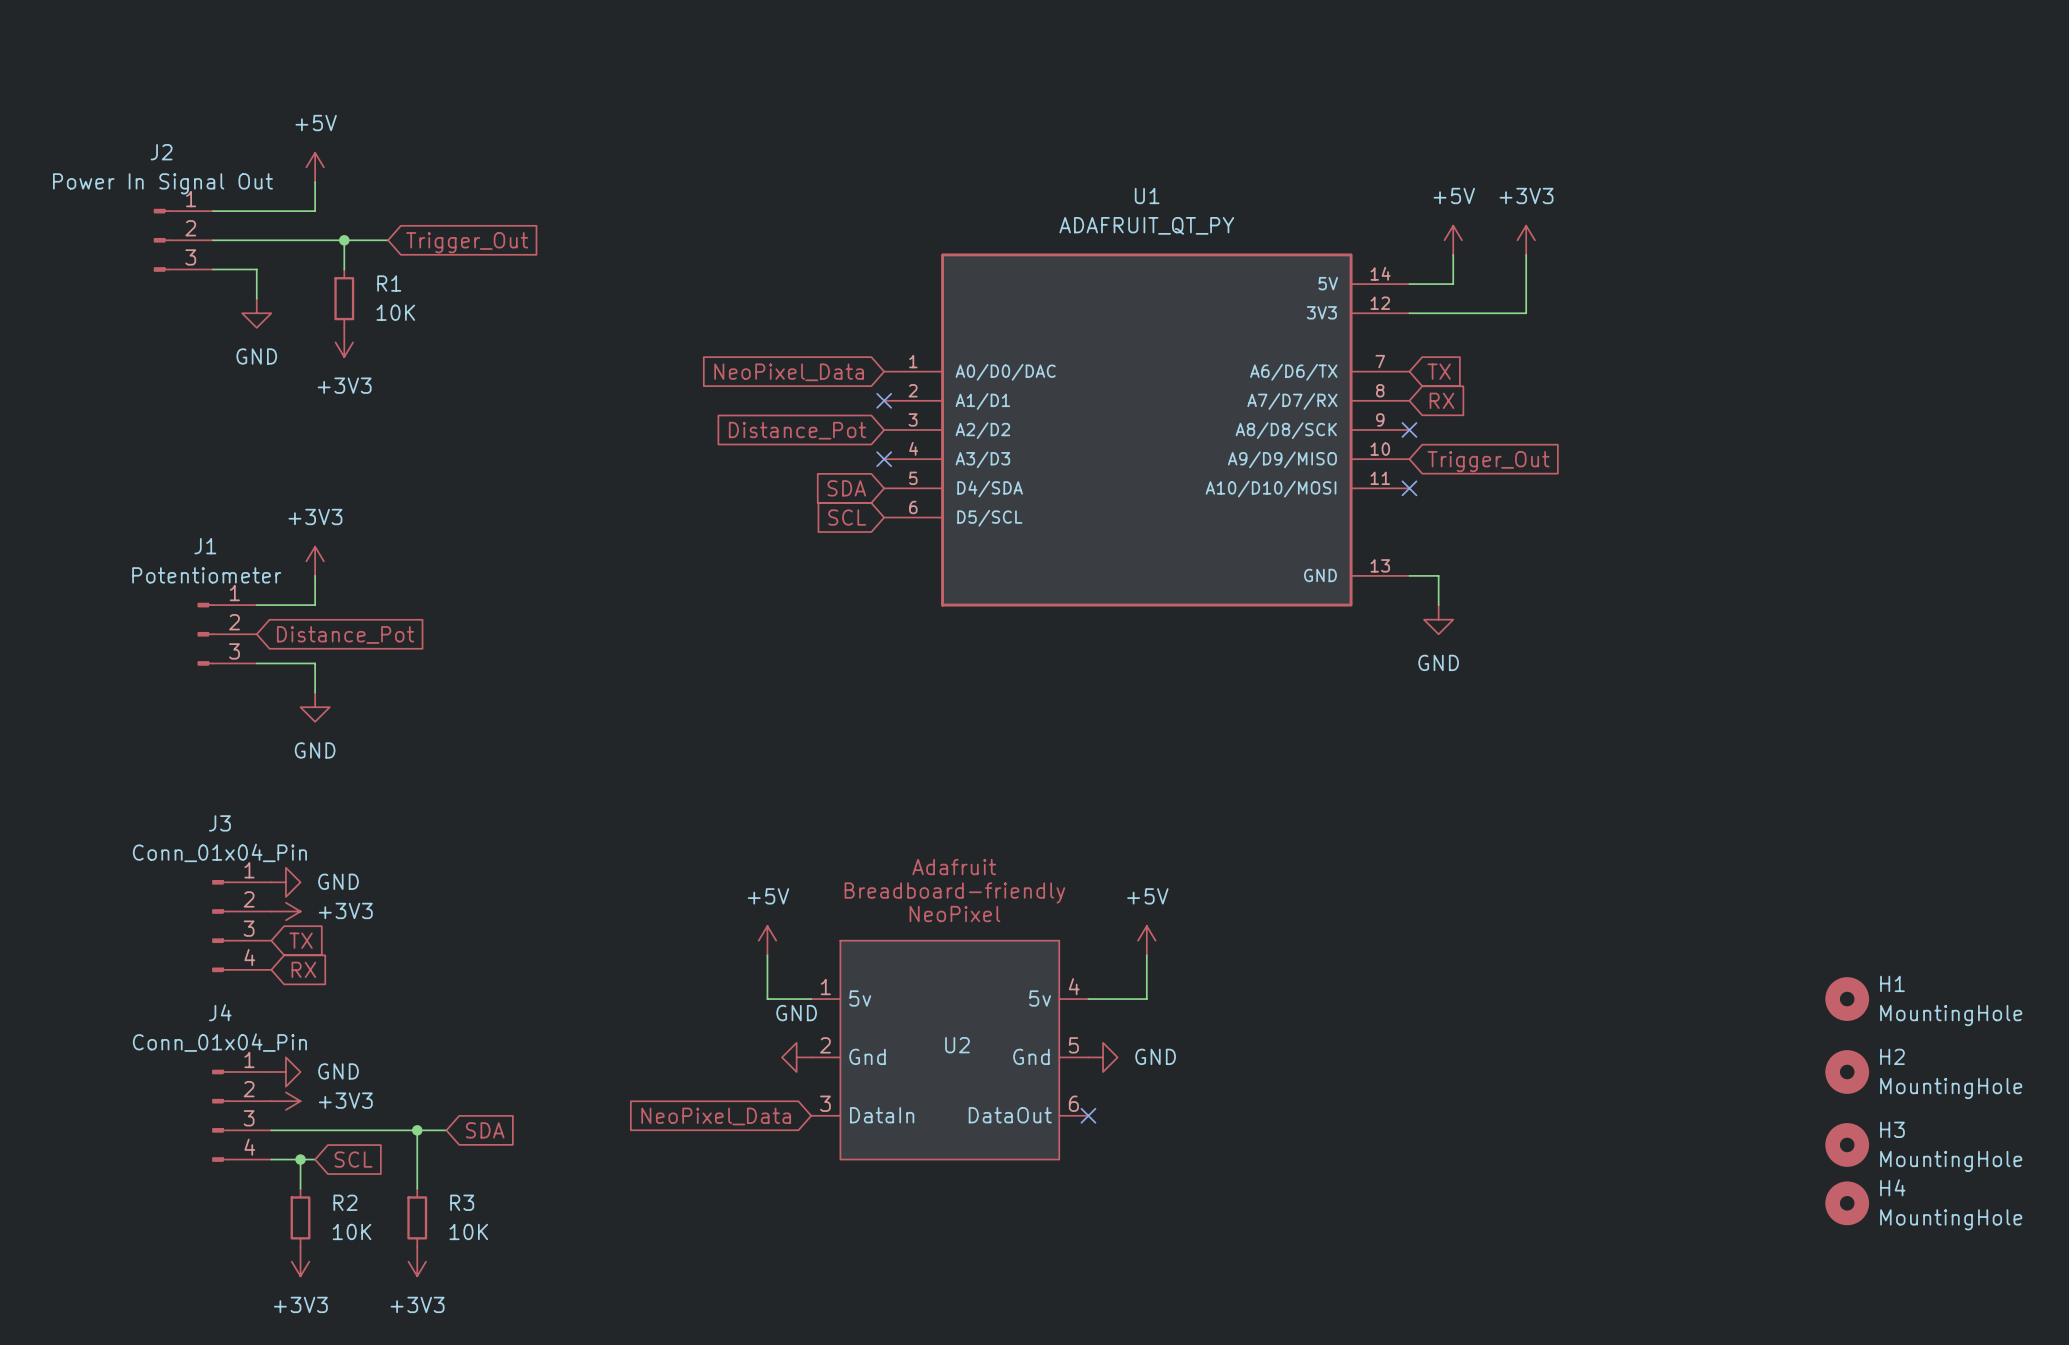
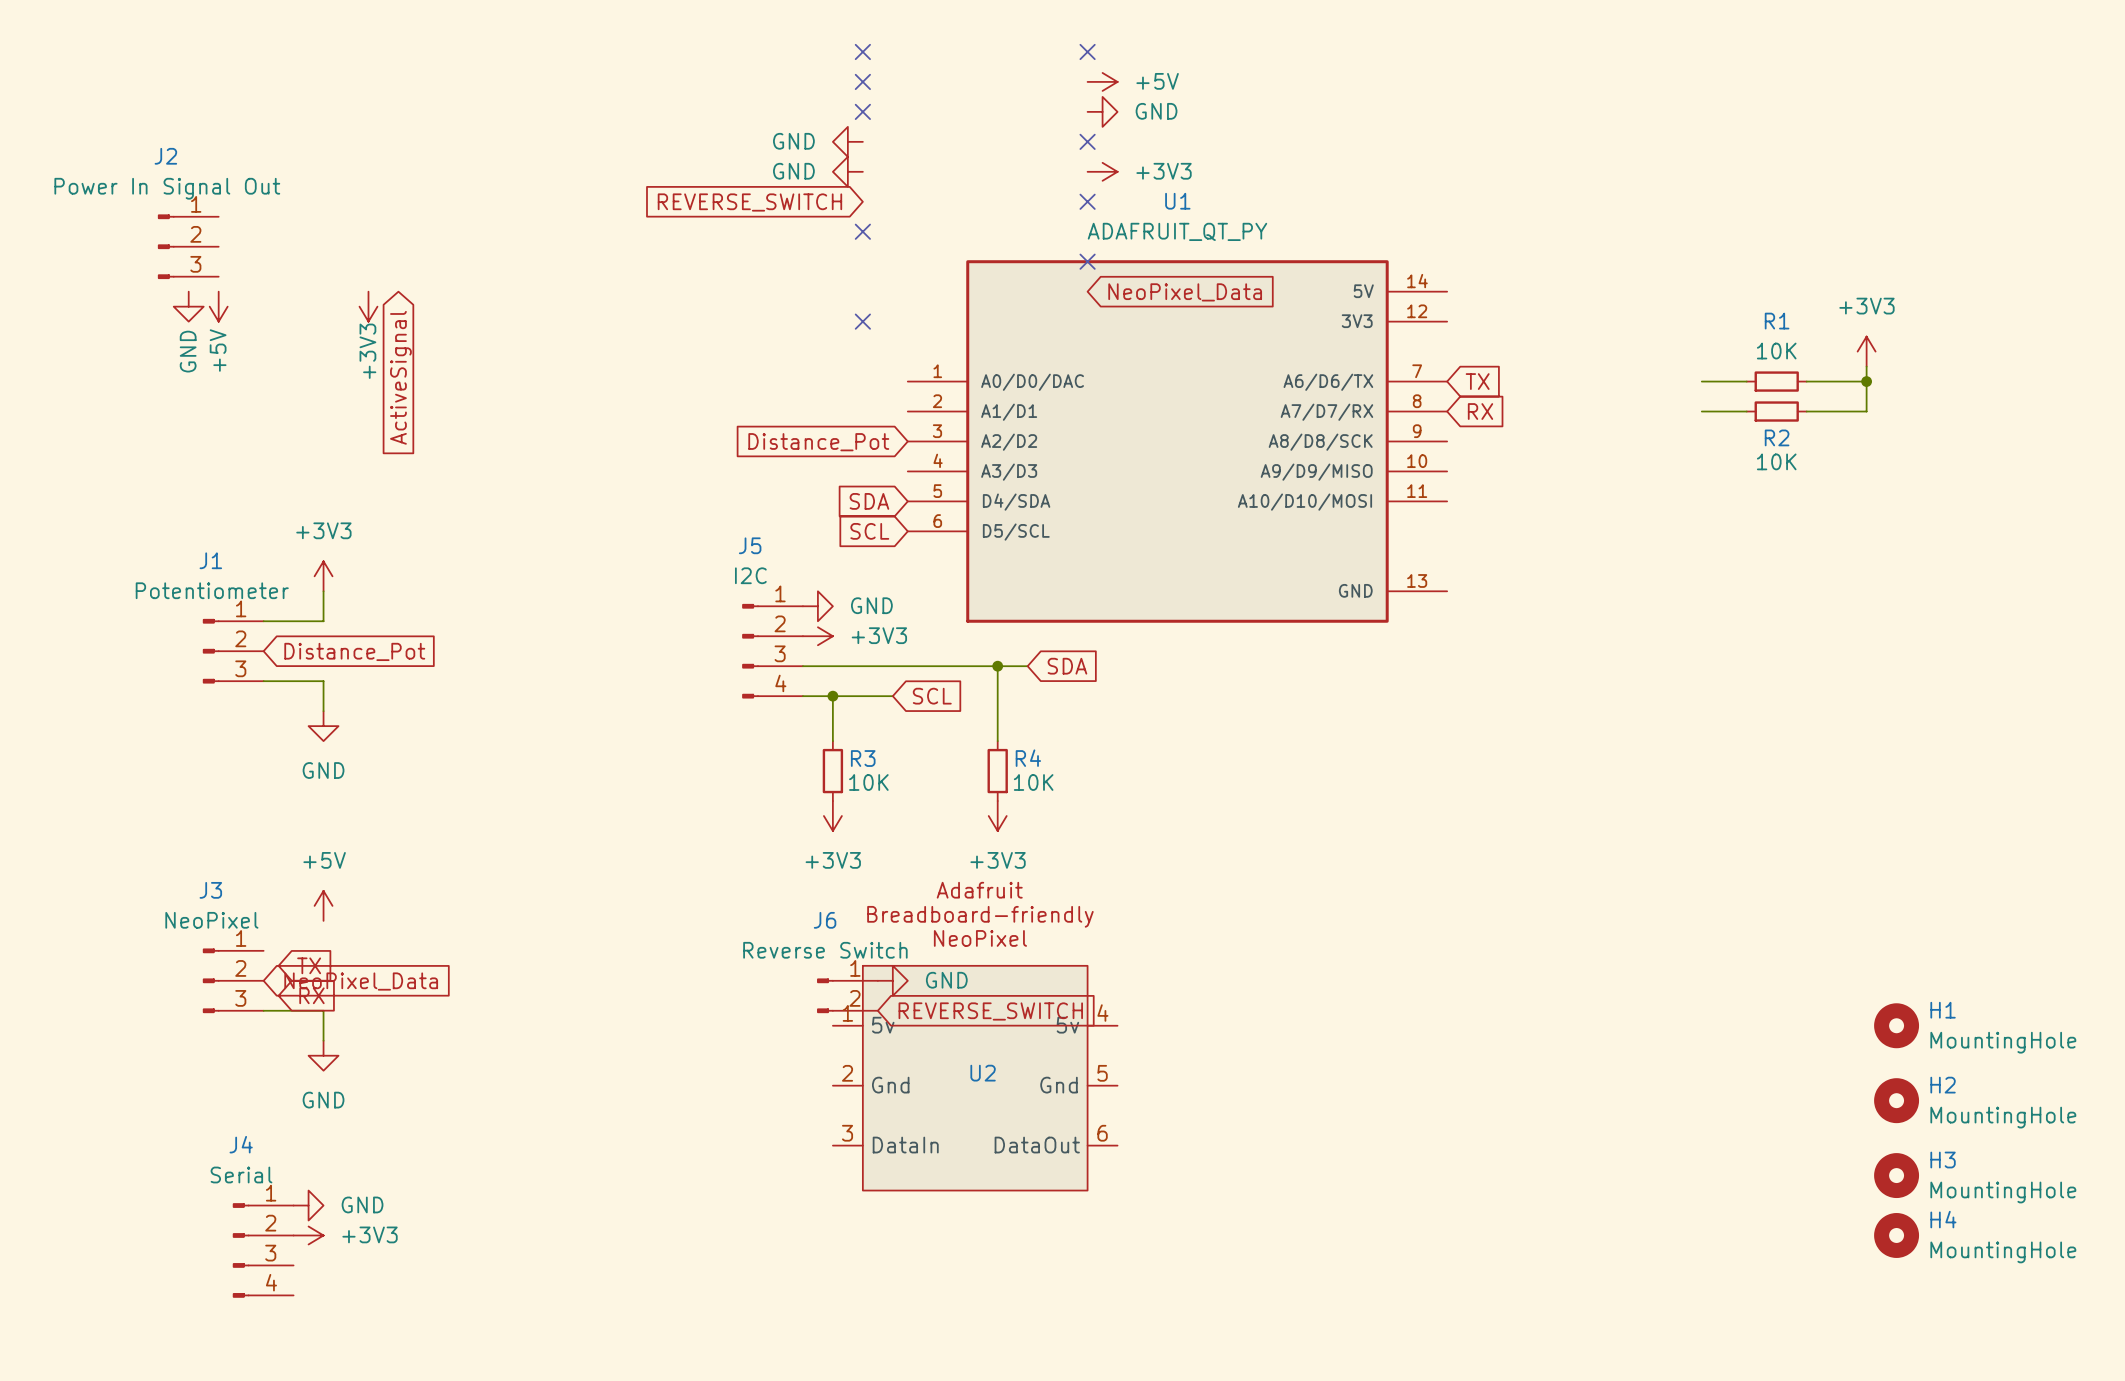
no-connect mark: none -> (862, 51)
no-connect mark: none -> (1087, 51)
no-connect mark: none -> (862, 81)
power symbol: none -> +5V (1102, 81)
no-connect mark: none -> (862, 111)
power symbol: none -> GND (1102, 111)
power symbol: none -> GND (847, 141)
no-connect mark: none -> (1087, 141)
power symbol rotation: 0° (315, 167) -> 180° (218, 306)
power symbol position: +5V (315, 167) -> +5V (218, 306)
power symbol: none -> GND (847, 171)
power symbol: none -> +3V3 (1102, 171)
wire: (315, 181) (315, 211) (212, 211) -> none
no-connect mark: none -> (1087, 201)
global label: none -> REVERSE_SWITCH (749, 202)
no-connect mark: none -> (862, 231)
wire: (212, 240) (388, 240) -> none
wire: (344, 240) (344, 269) -> none
junction: (344, 240) -> none
power symbol: +5V (1453, 240) -> none
power symbol: +3V3 (1526, 240) -> none
global label: Trigger_Out (467, 242) -> none
no-connect mark: none -> (1087, 261)
wire: (1453, 254) (1453, 284) (1409, 284) -> none
wire: (1526, 254) (1526, 313) (1409, 313) -> none
wire: (212, 269) (256, 269) (256, 298) -> none
R1 name position: R1 (389, 283) -> R1 (1777, 321)
R1 rotation: 0° (344, 298) -> 90° clockwise (1776, 381)
R1 position: (344, 298) -> (1776, 381)
R1 value position: 10K (395, 312) -> 10K (1776, 351)
power symbol position: GND (256, 313) -> GND (188, 306)
no-connect mark: none -> (862, 321)
power symbol position: +3V3 (344, 342) -> +3V3 (368, 306)
power symbol: none -> +3V3 (1866, 351)
power symbol text rotation: 0° (256, 356) -> 90° counterclockwise (188, 351)
wire: none -> (1866, 366) (1866, 411) (1806, 411)
global label: none -> ActiveSignal (400, 377)
wire: none -> (1701, 381) (1746, 381)
wire: none -> (1806, 381) (1866, 381)
junction: none -> (1866, 381)
global label rotation: 0° (789, 372) -> 180° (1185, 292)
global label position: NeoPixel_Data (789, 372) -> NeoPixel_Data (1185, 292)
power symbol text rotation: 0° (344, 385) -> 90° counterclockwise (367, 351)
no-connect mark: (884, 400) -> none
wire: none -> (1701, 411) (1746, 411)
no-connect mark: (1409, 429) -> none
no-connect mark: (884, 459) -> none
global label: Trigger_Out (1488, 461) -> none
no-connect mark: (1409, 488) -> none
wire: (1409, 575) (1438, 575) (1438, 605) -> none
power symbol: none -> GND (817, 606)
power symbol: none -> +3V3 (817, 636)
power symbol: GND (1438, 619) -> none
J5: none -> I2C (772, 651)
wire: none -> (802, 666) (1027, 666)
wire: none -> (997, 666) (997, 741)
junction: none -> (997, 666)
global label: none -> SDA (1067, 666)
wire: none -> (802, 696) (892, 696)
wire: none -> (832, 696) (832, 741)
junction: none -> (832, 696)
global label: none -> SCL (932, 696)
R4: none -> 10K (997, 771)
power symbol: none -> +3V3 (832, 816)
power symbol: none -> +3V3 (997, 816)
J3 value: Conn_01x04_Pin (219, 852) -> NeoPixel (211, 920)
J3 symbol: [212, 879, 272, 973] -> [202, 948, 264, 1014]
power symbol: GND (285, 882) -> none
power symbol: none -> +5V (323, 905)
power symbol: +3V3 (285, 911) -> none
power symbol: +5V (767, 940) -> none
power symbol: +5V (1146, 940) -> none
global label: none -> NeoPixel_Data (361, 981)
wire: (767, 955) (767, 999) (811, 999) -> none
wire: (1146, 955) (1146, 999) (1088, 999) -> none
J6: none -> Reverse Switch (847, 995)
wire: none -> (263, 1010) (323, 1010) (323, 1040)
global label: none -> REVERSE_SWITCH (990, 1011)
power symbol text position: GND (796, 1013) -> GND (946, 980)
power symbol: none -> GND (323, 1055)
J4 value: Conn_01x04_Pin (219, 1042) -> Serial (241, 1175)
power symbol rotation: 0° (796, 1057) -> 180° (892, 980)
power symbol position: GND (796, 1057) -> GND (892, 980)
power symbol: GND (1103, 1057) -> none
power symbol: GND (285, 1072) -> none
power symbol: +3V3 (285, 1101) -> none
J4 position: (241, 1115) -> (263, 1250)
no-connect mark: (1088, 1115) -> none
global label: NeoPixel_Data (716, 1116) -> none
wire: (271, 1130) (446, 1130) -> none
wire: (417, 1130) (417, 1188) -> none
junction: (417, 1130) -> none
global label: SDA (485, 1130) -> none
wire: (271, 1159) (315, 1159) -> none
junction: (300, 1159) -> none
global label: SCL (353, 1159) -> none
power symbol: none -> GND (308, 1205)
R2 name position: R2 (345, 1202) -> R2 (1777, 437)
R3 name position: R3 (462, 1202) -> R3 (863, 758)
power symbol: none -> +3V3 (308, 1235)
R2 rotation: 0° (300, 1217) -> 90° clockwise (1776, 411)
R2 position: (300, 1217) -> (1776, 411)
R3 position: (417, 1217) -> (832, 771)
R3 value position: 10K (468, 1231) -> 10K (868, 782)
power symbol: +3V3 (300, 1261) -> none
power symbol: +3V3 (417, 1261) -> none

